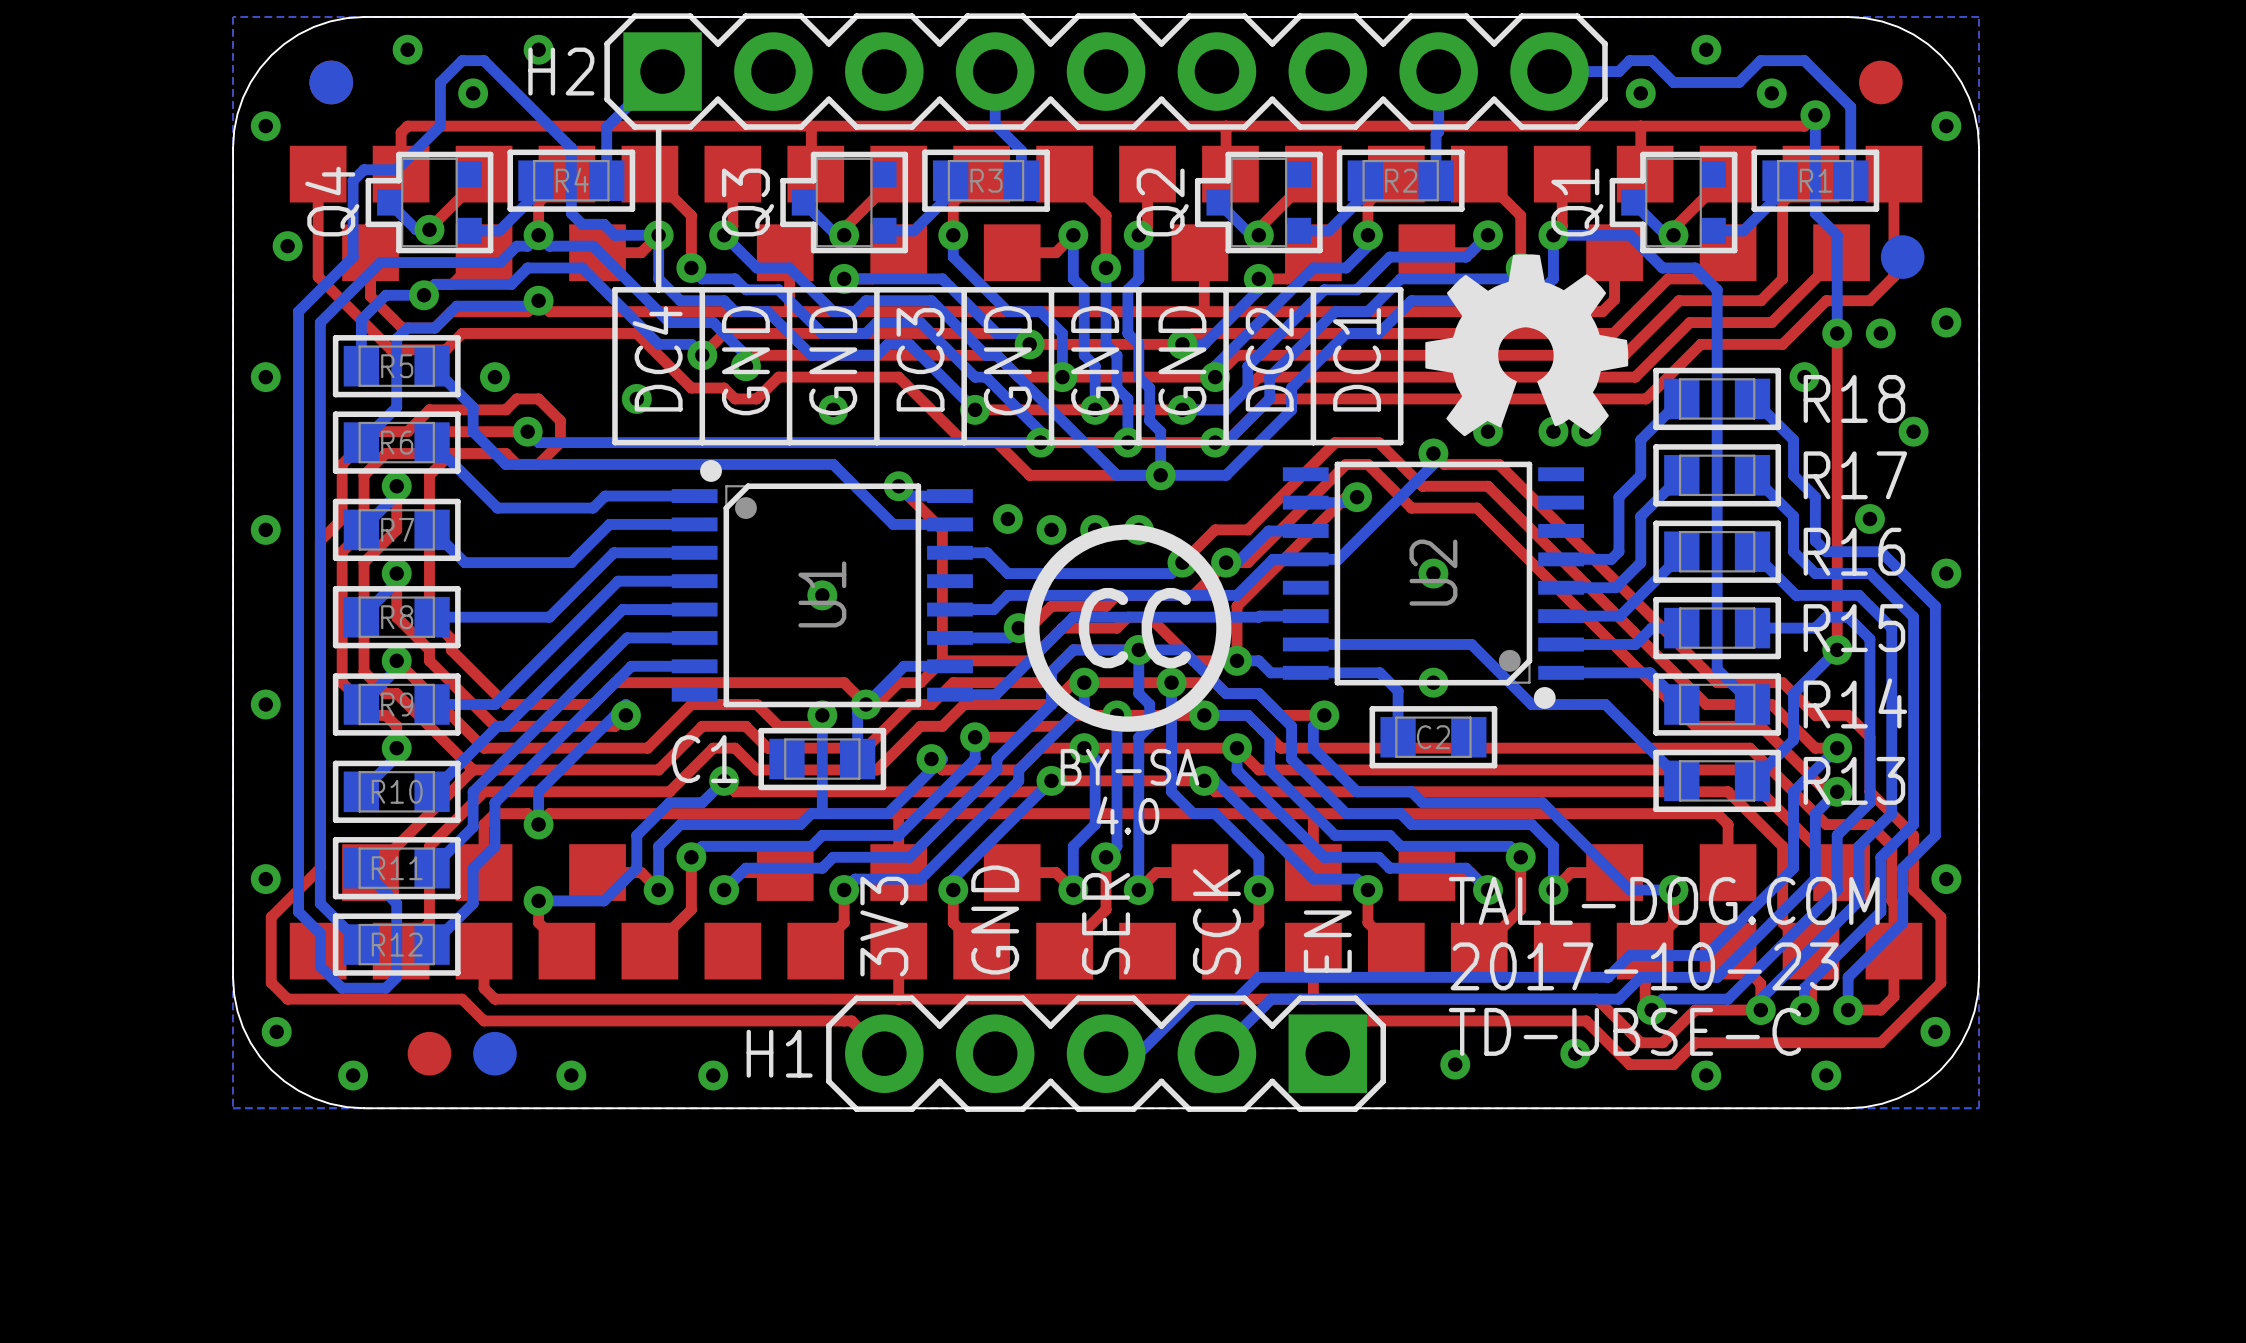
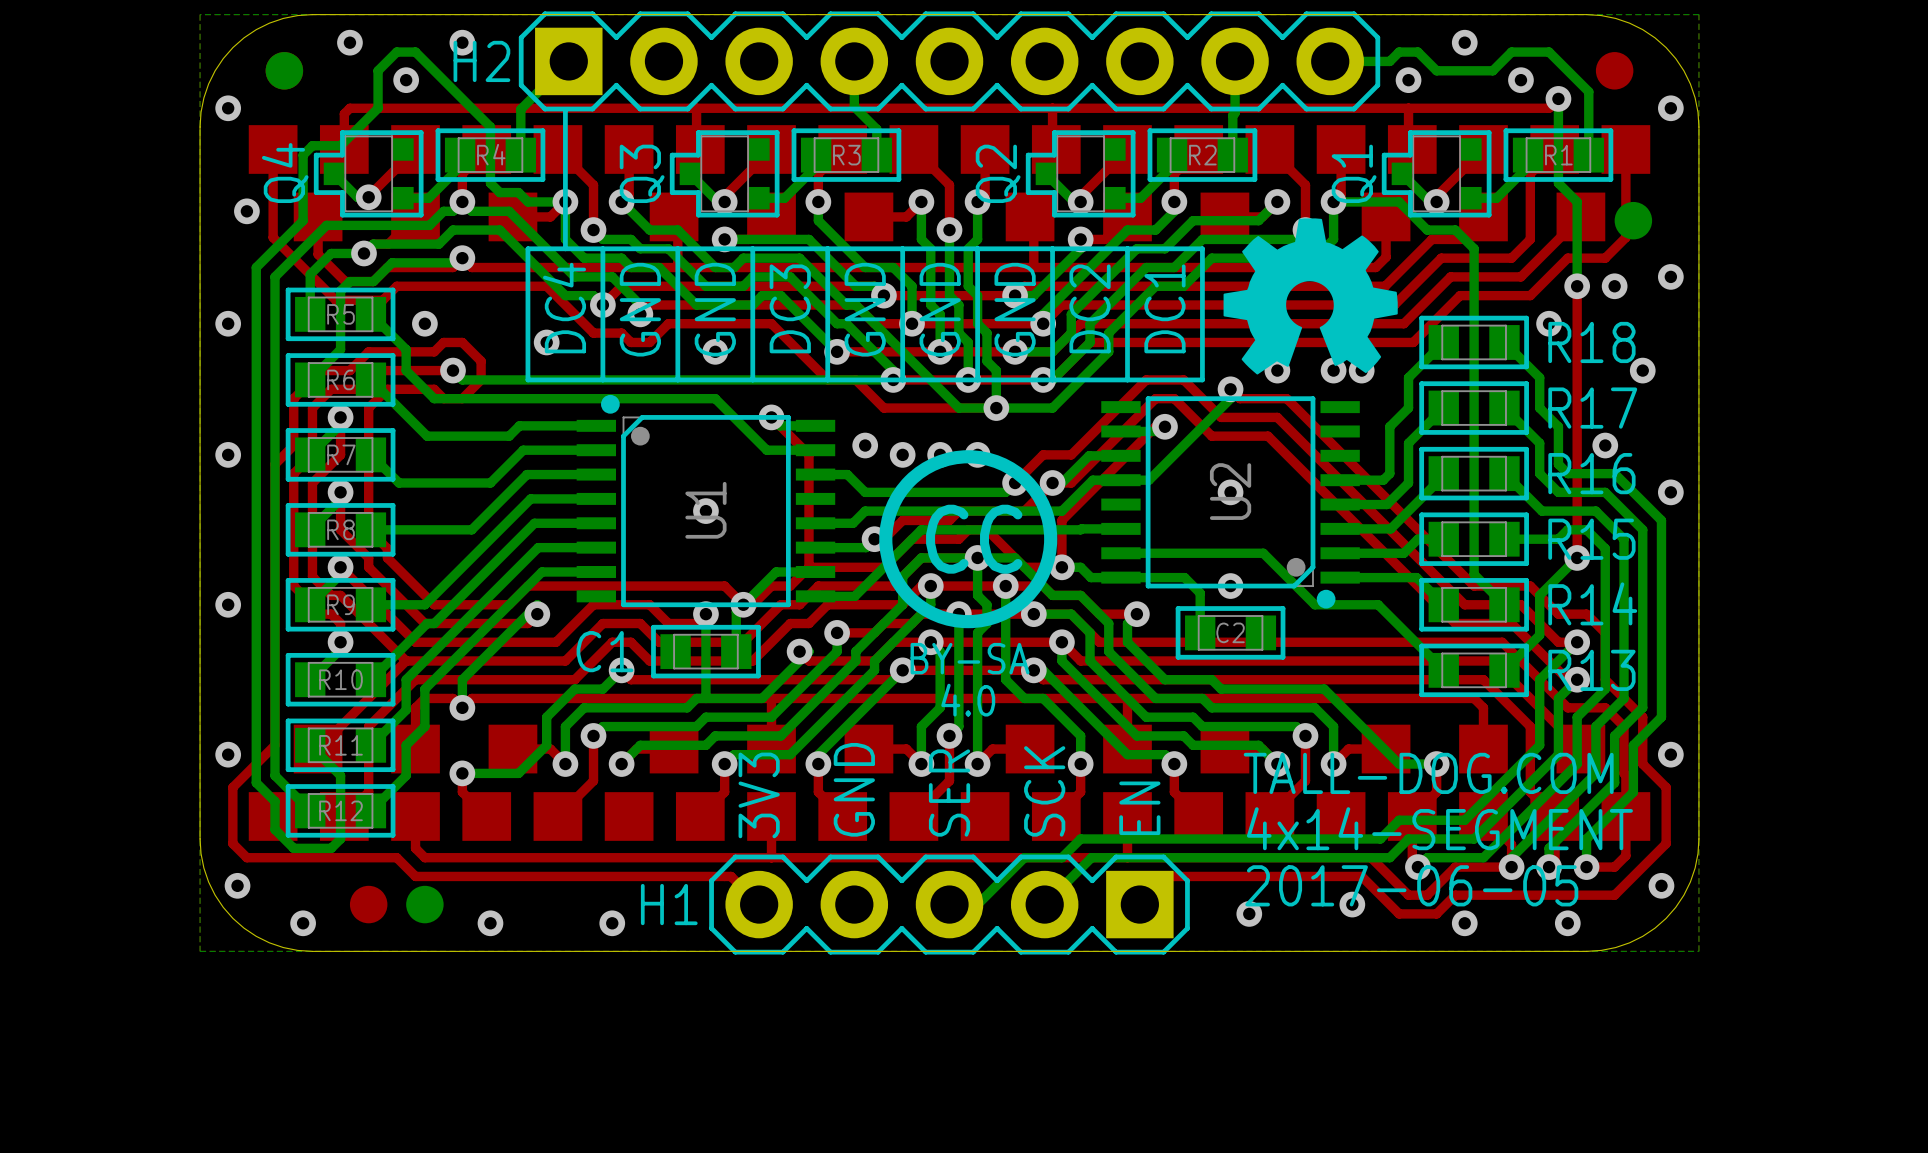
text: 2017-10-23 (1644, 966) -> 4x14-SEGMENT (1439, 828)
text: TD-UBSE-C (1624, 1031) -> 2017-06-05 (1411, 885)

